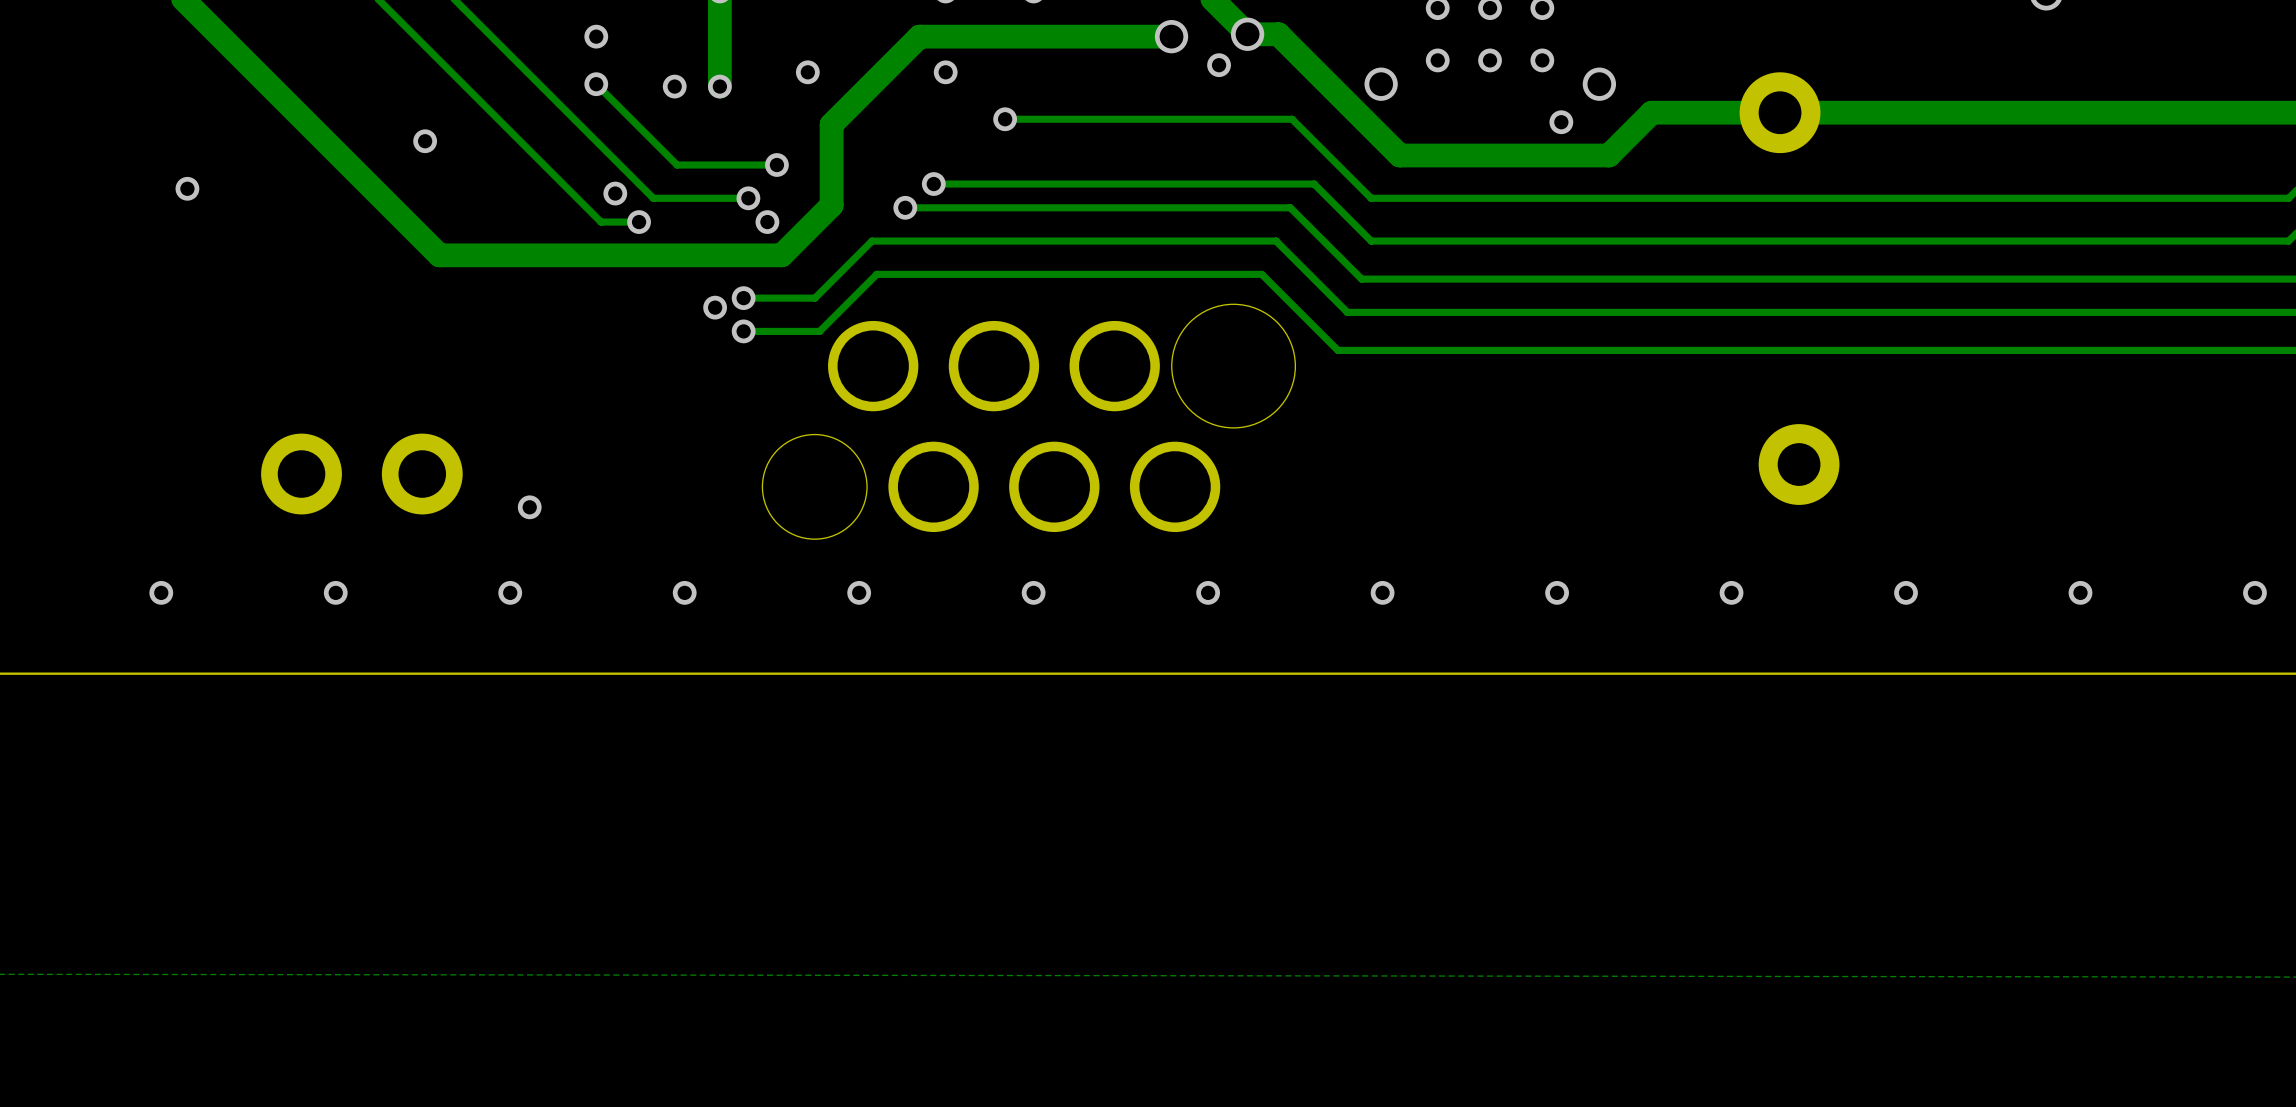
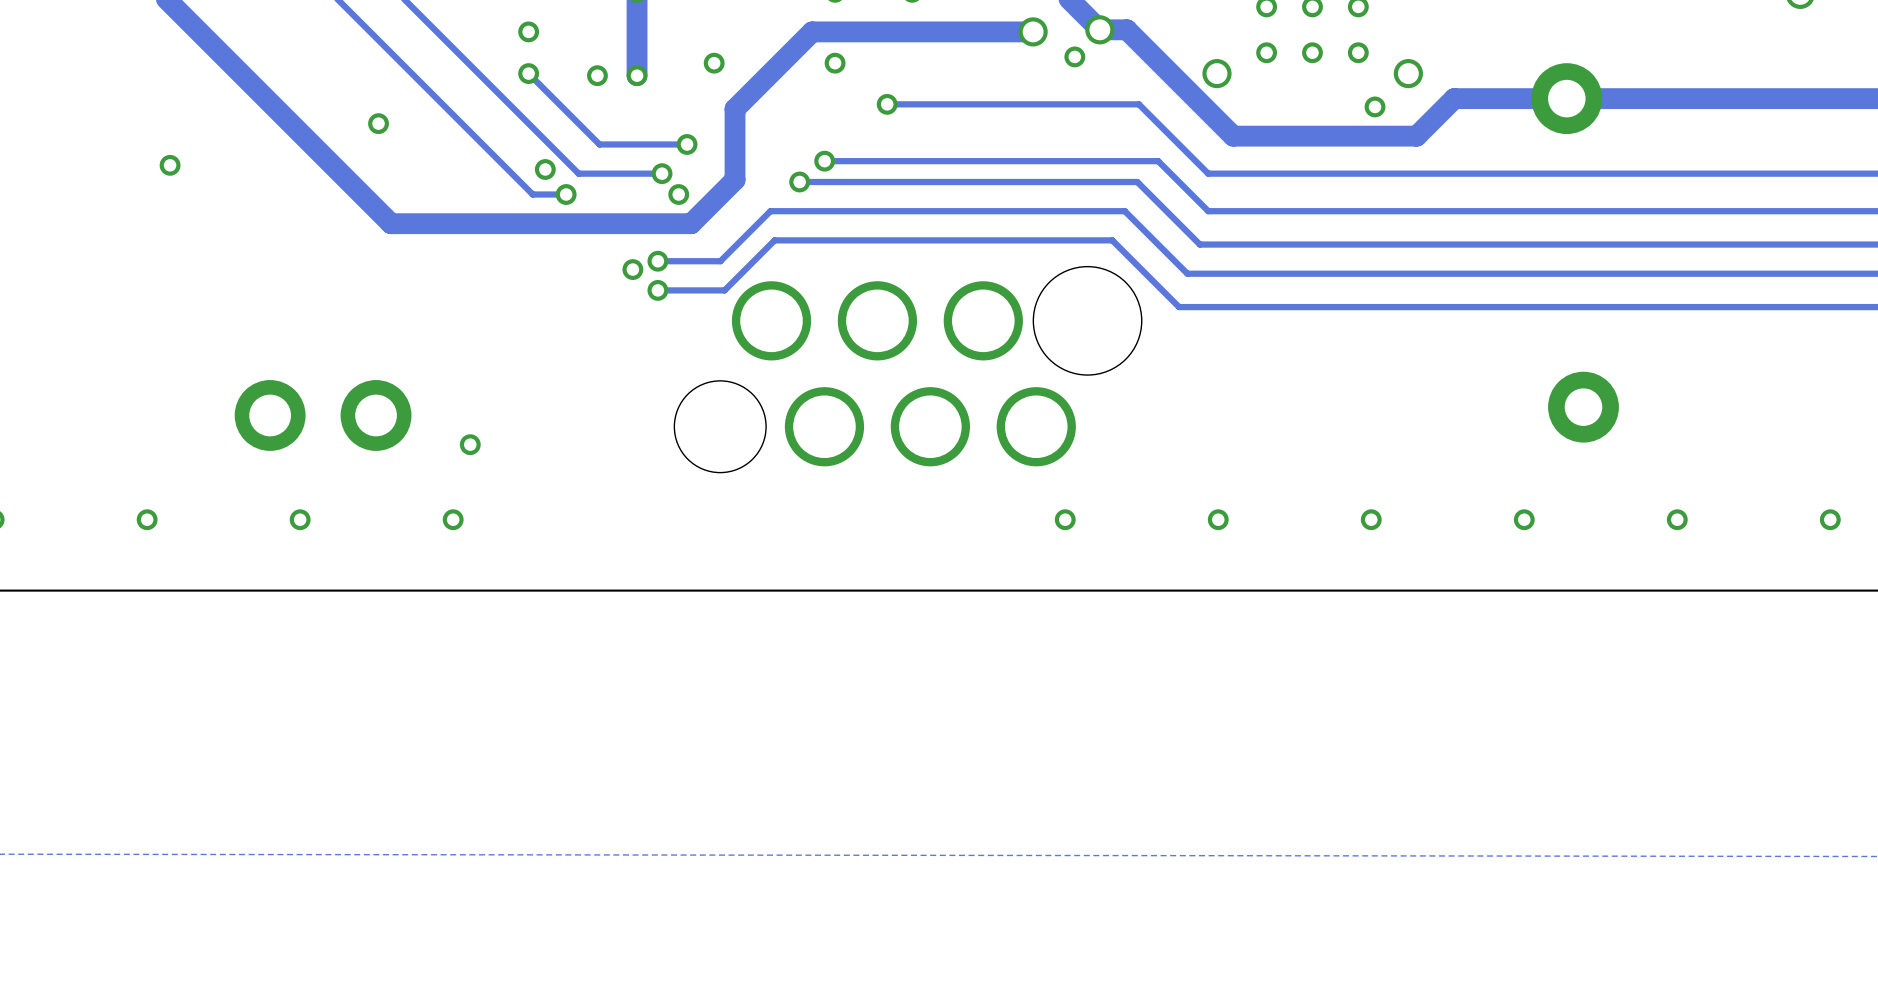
via: (684, 592) -> none
via: (859, 592) -> none
via: (1033, 592) -> none

